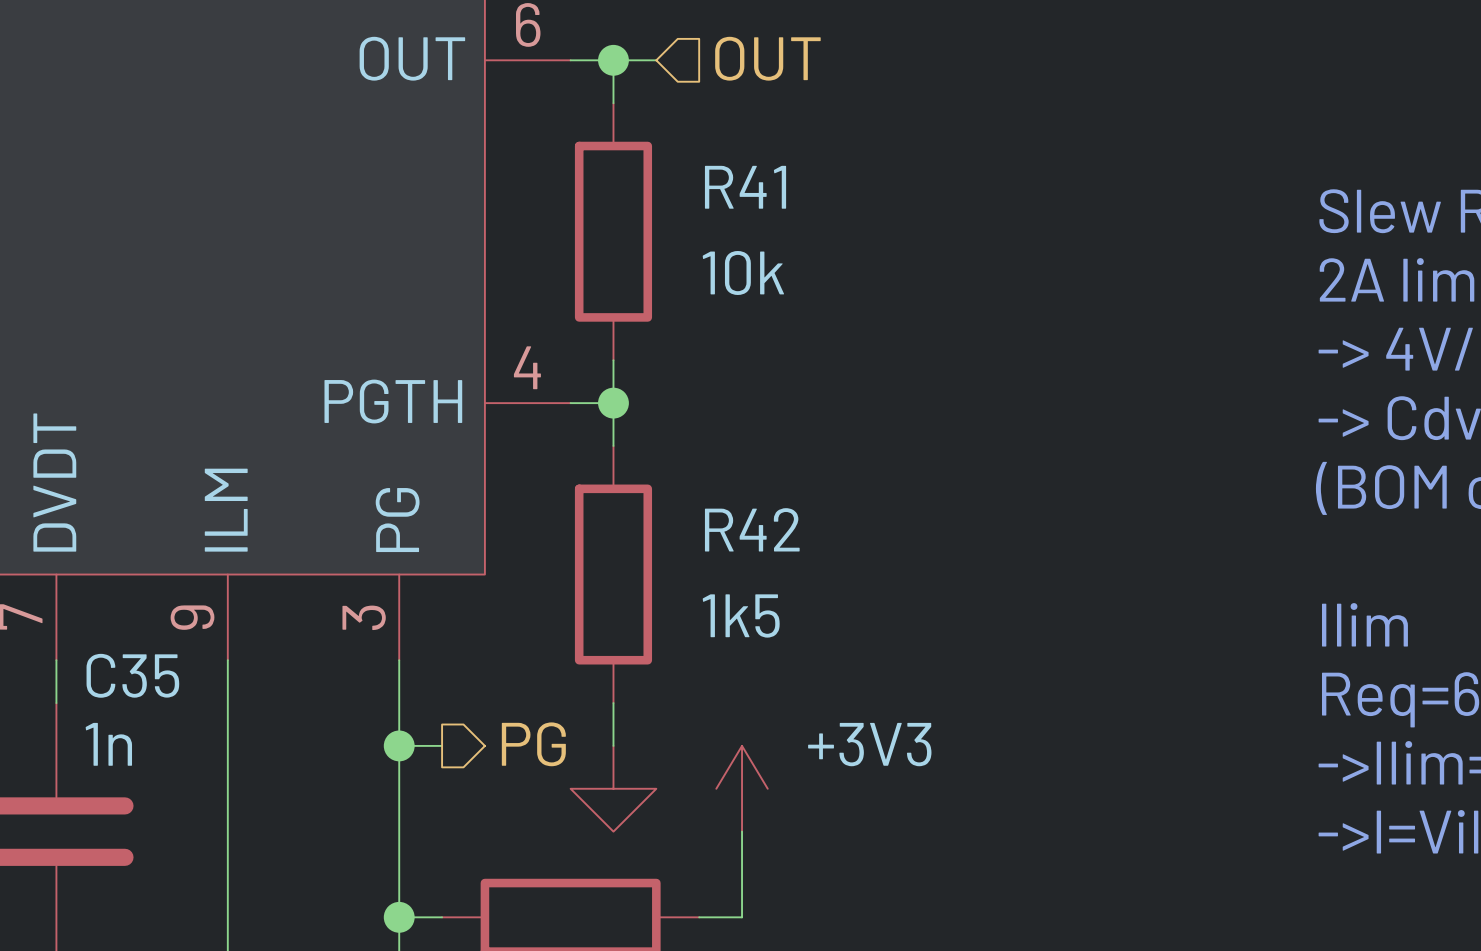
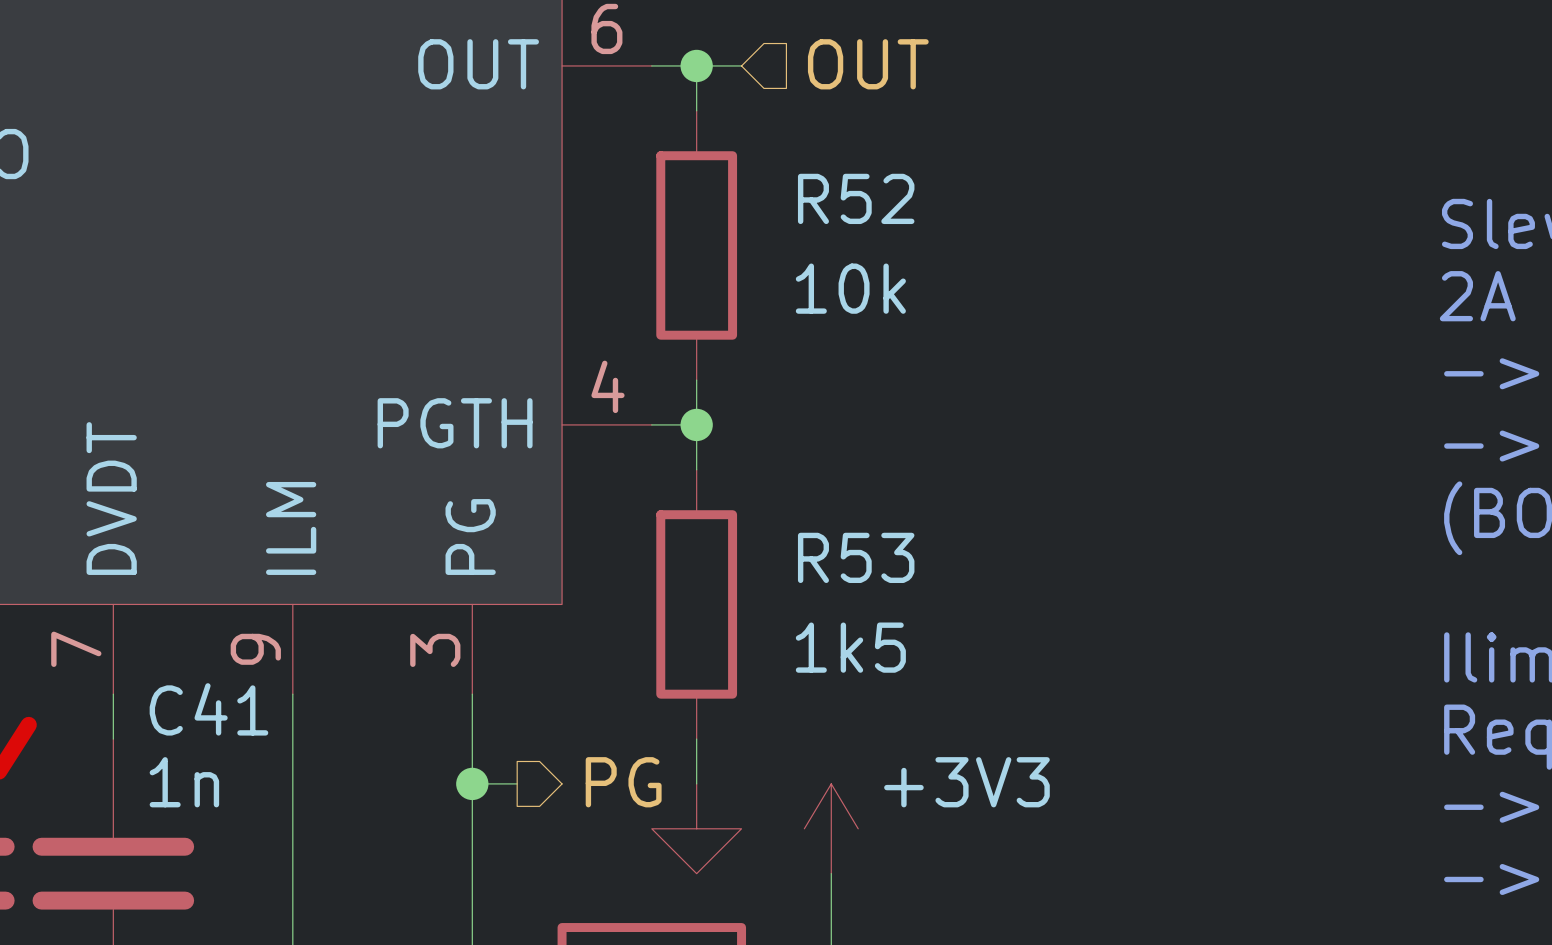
R41 name: R41 (745, 187) -> R52 (856, 198)
R42 name: R42 (752, 529) -> R53 (856, 557)
C35 name: C35 (132, 675) -> C41 (208, 709)

